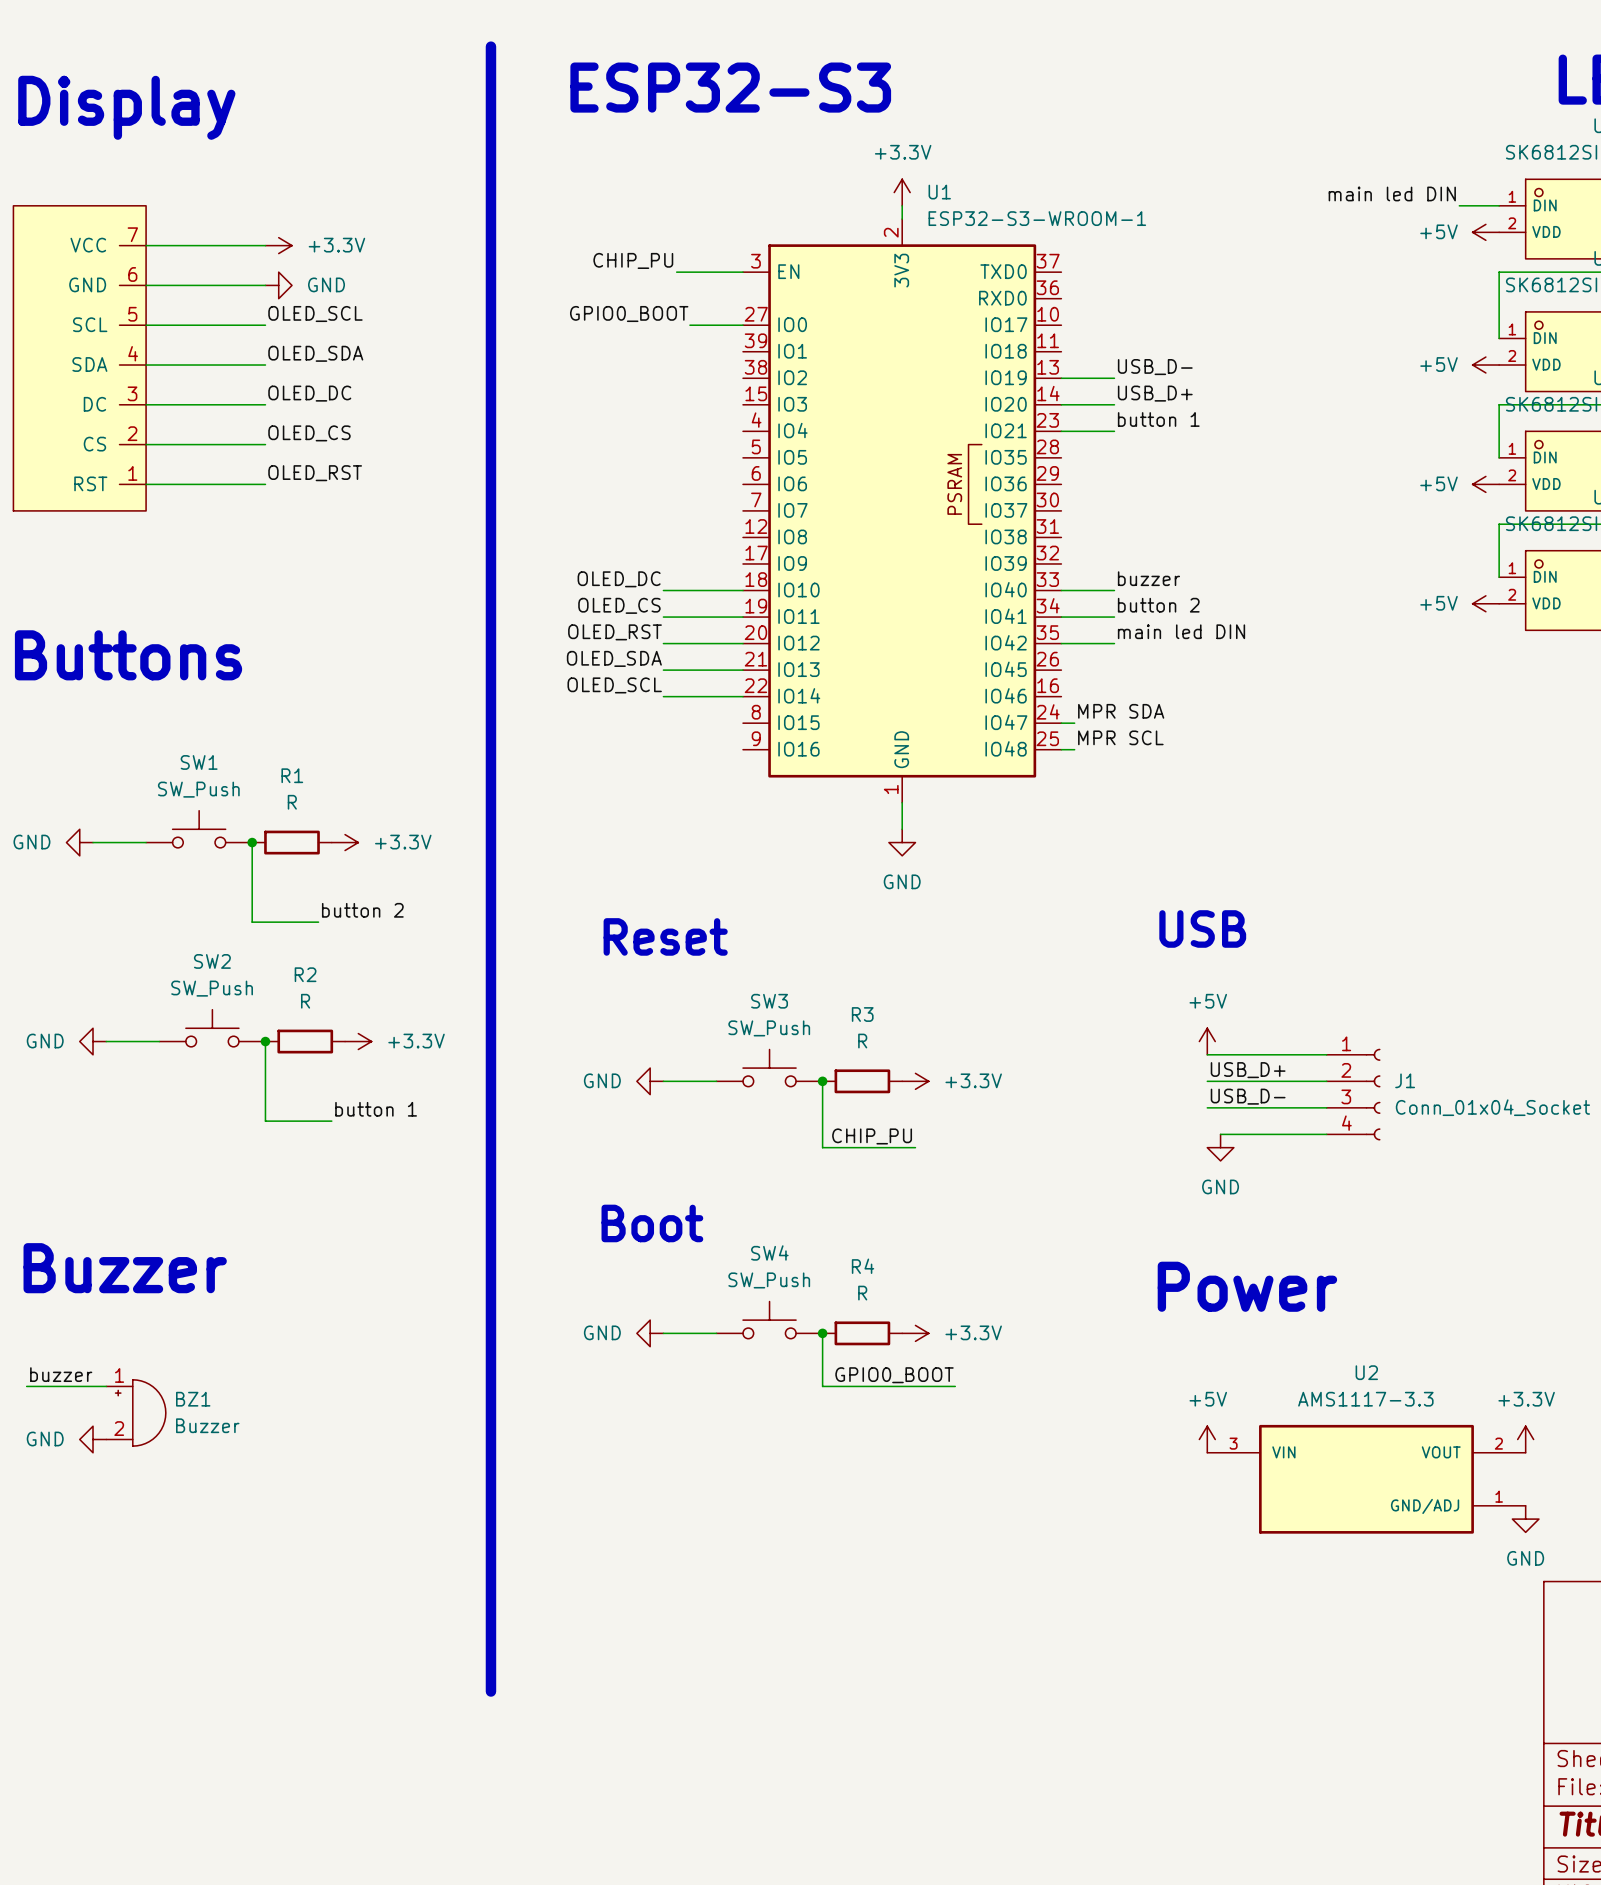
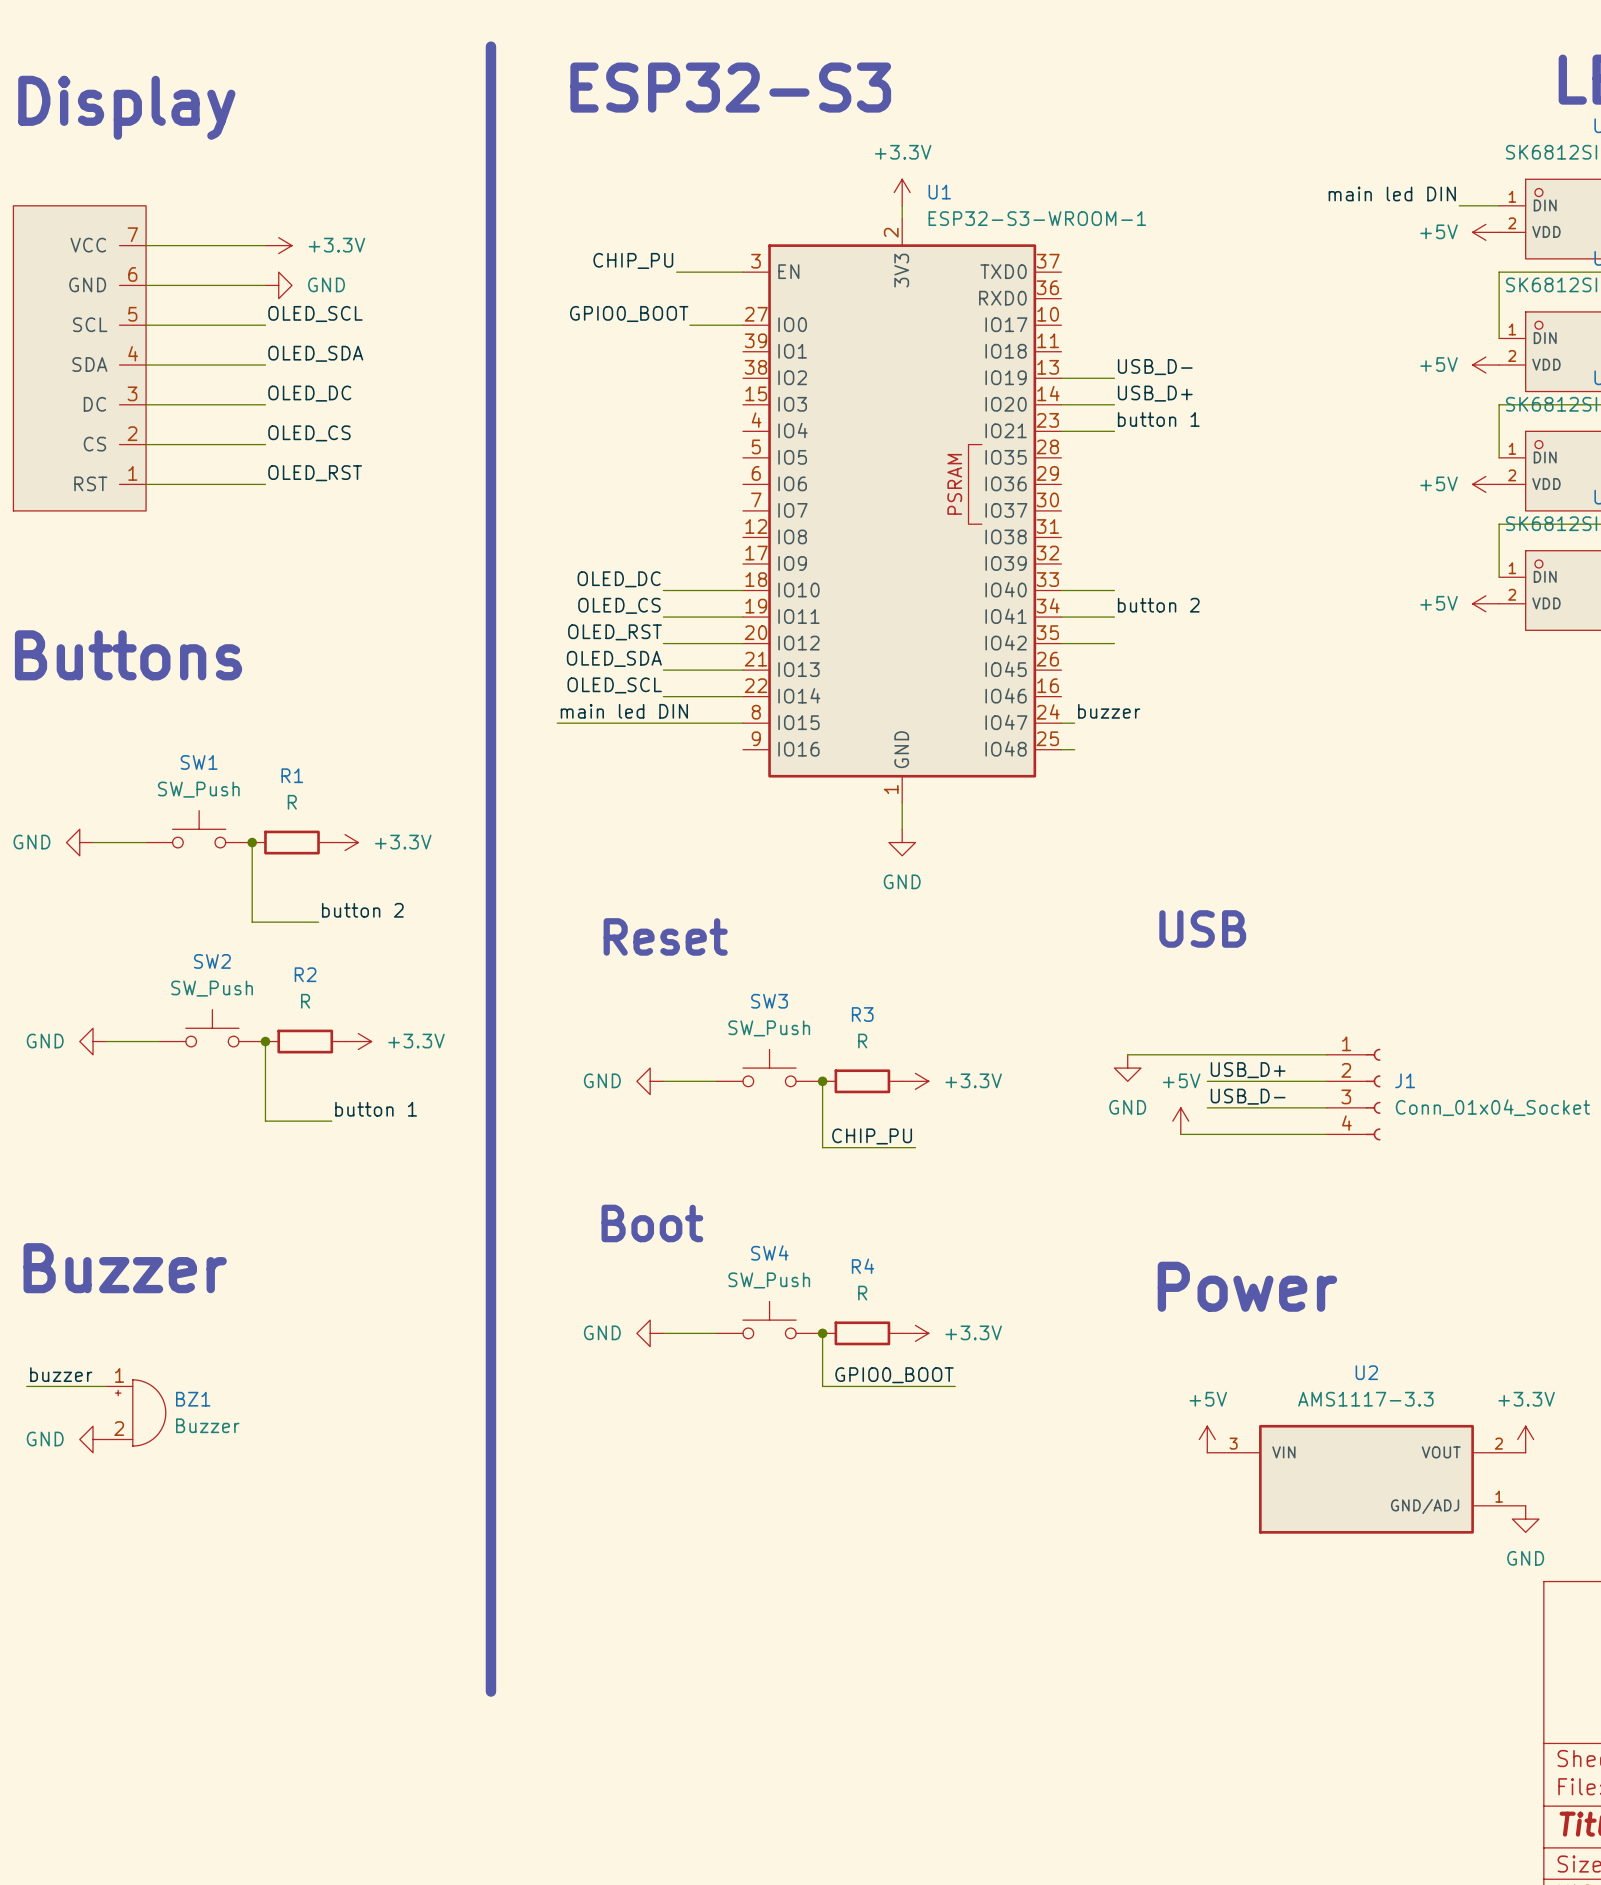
label: buzzer (1148, 578) -> none
label: main led DIN (1181, 631) -> none
label: none -> main led DIN (624, 711)
label: MPR SDA (1121, 711) -> buzzer (1109, 711)
wire: none -> (557, 723) (743, 723)
label: MPR SCL (1120, 737) -> none
power symbol position: +5V (1207, 1041) -> +5V (1180, 1121)
wire: none -> (1127, 1054) (1207, 1054)
wire: none -> (1180, 1134) (1220, 1134)
power symbol position: GND (1220, 1147) -> GND (1127, 1068)

